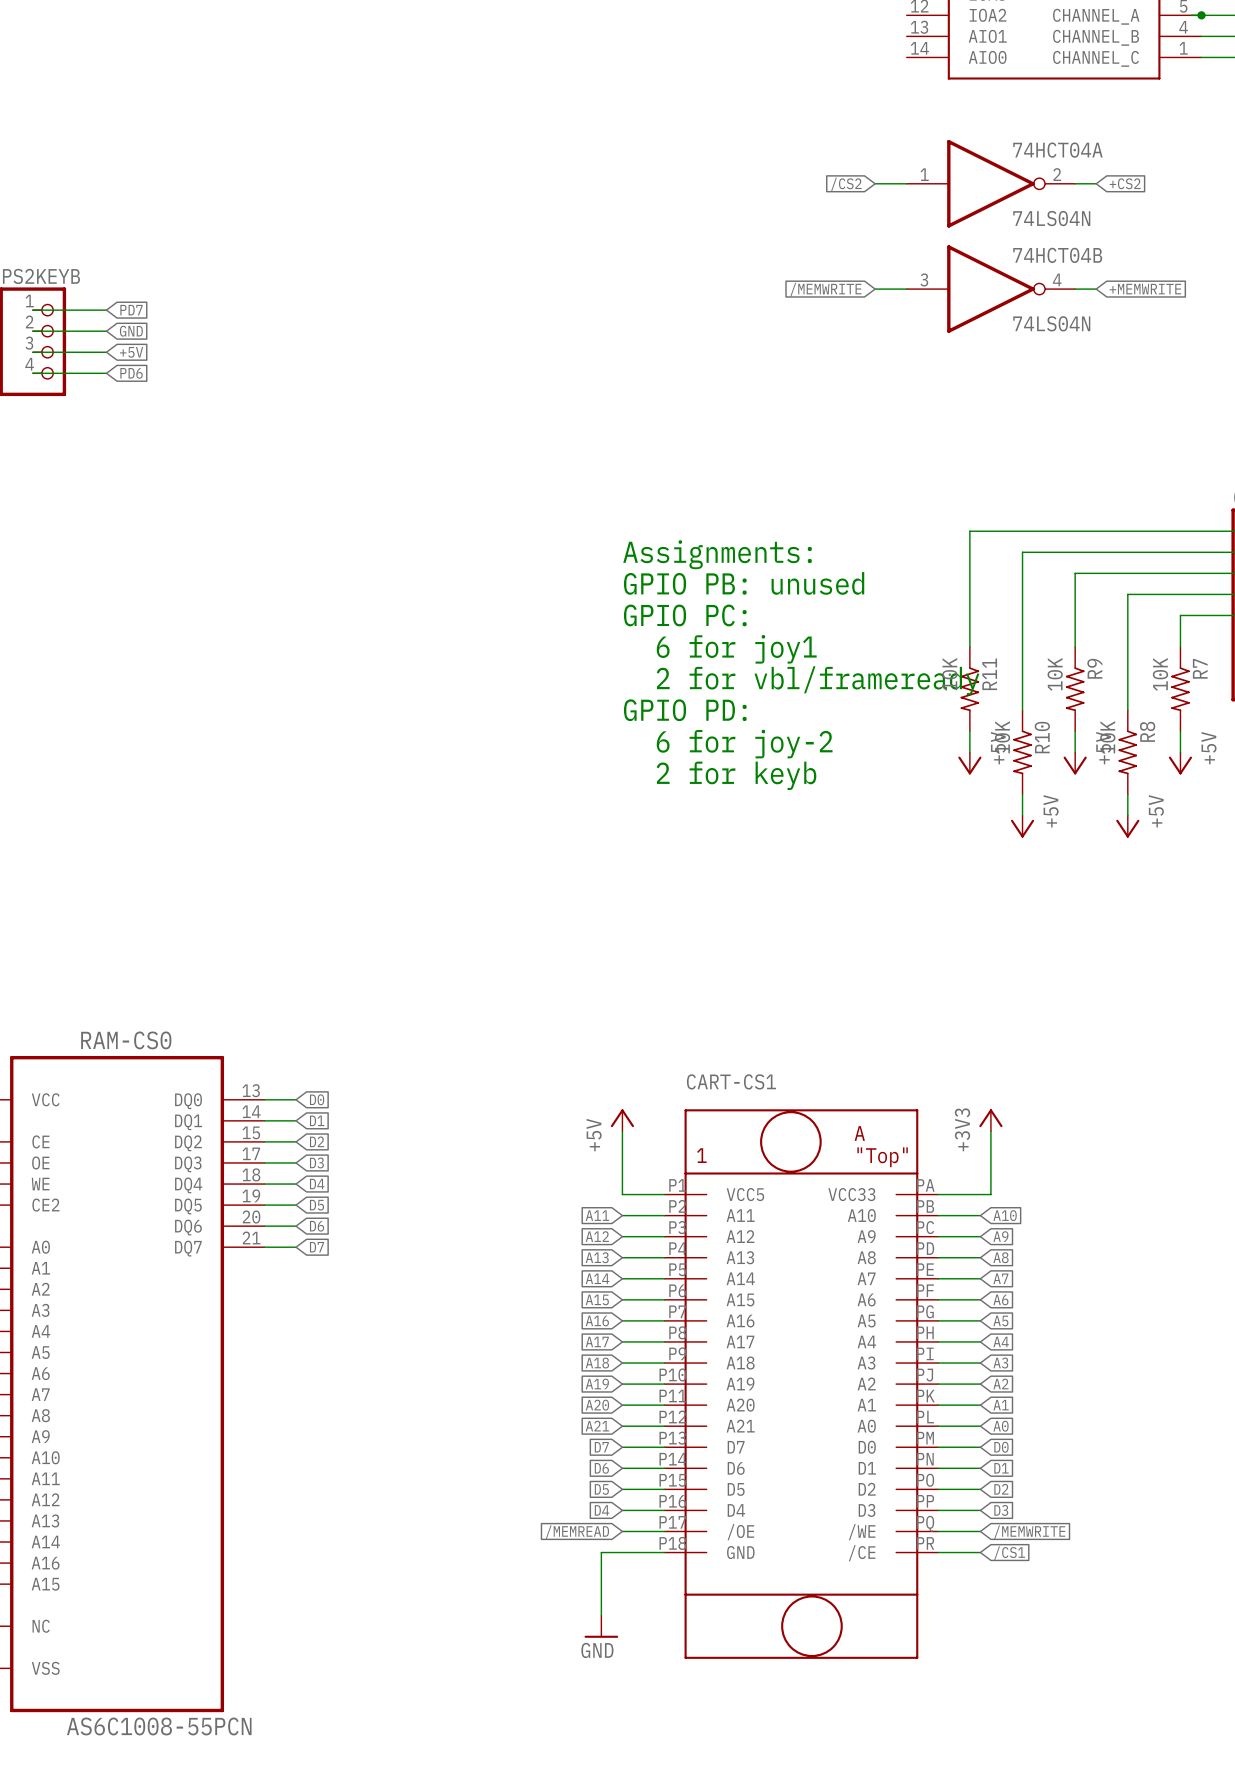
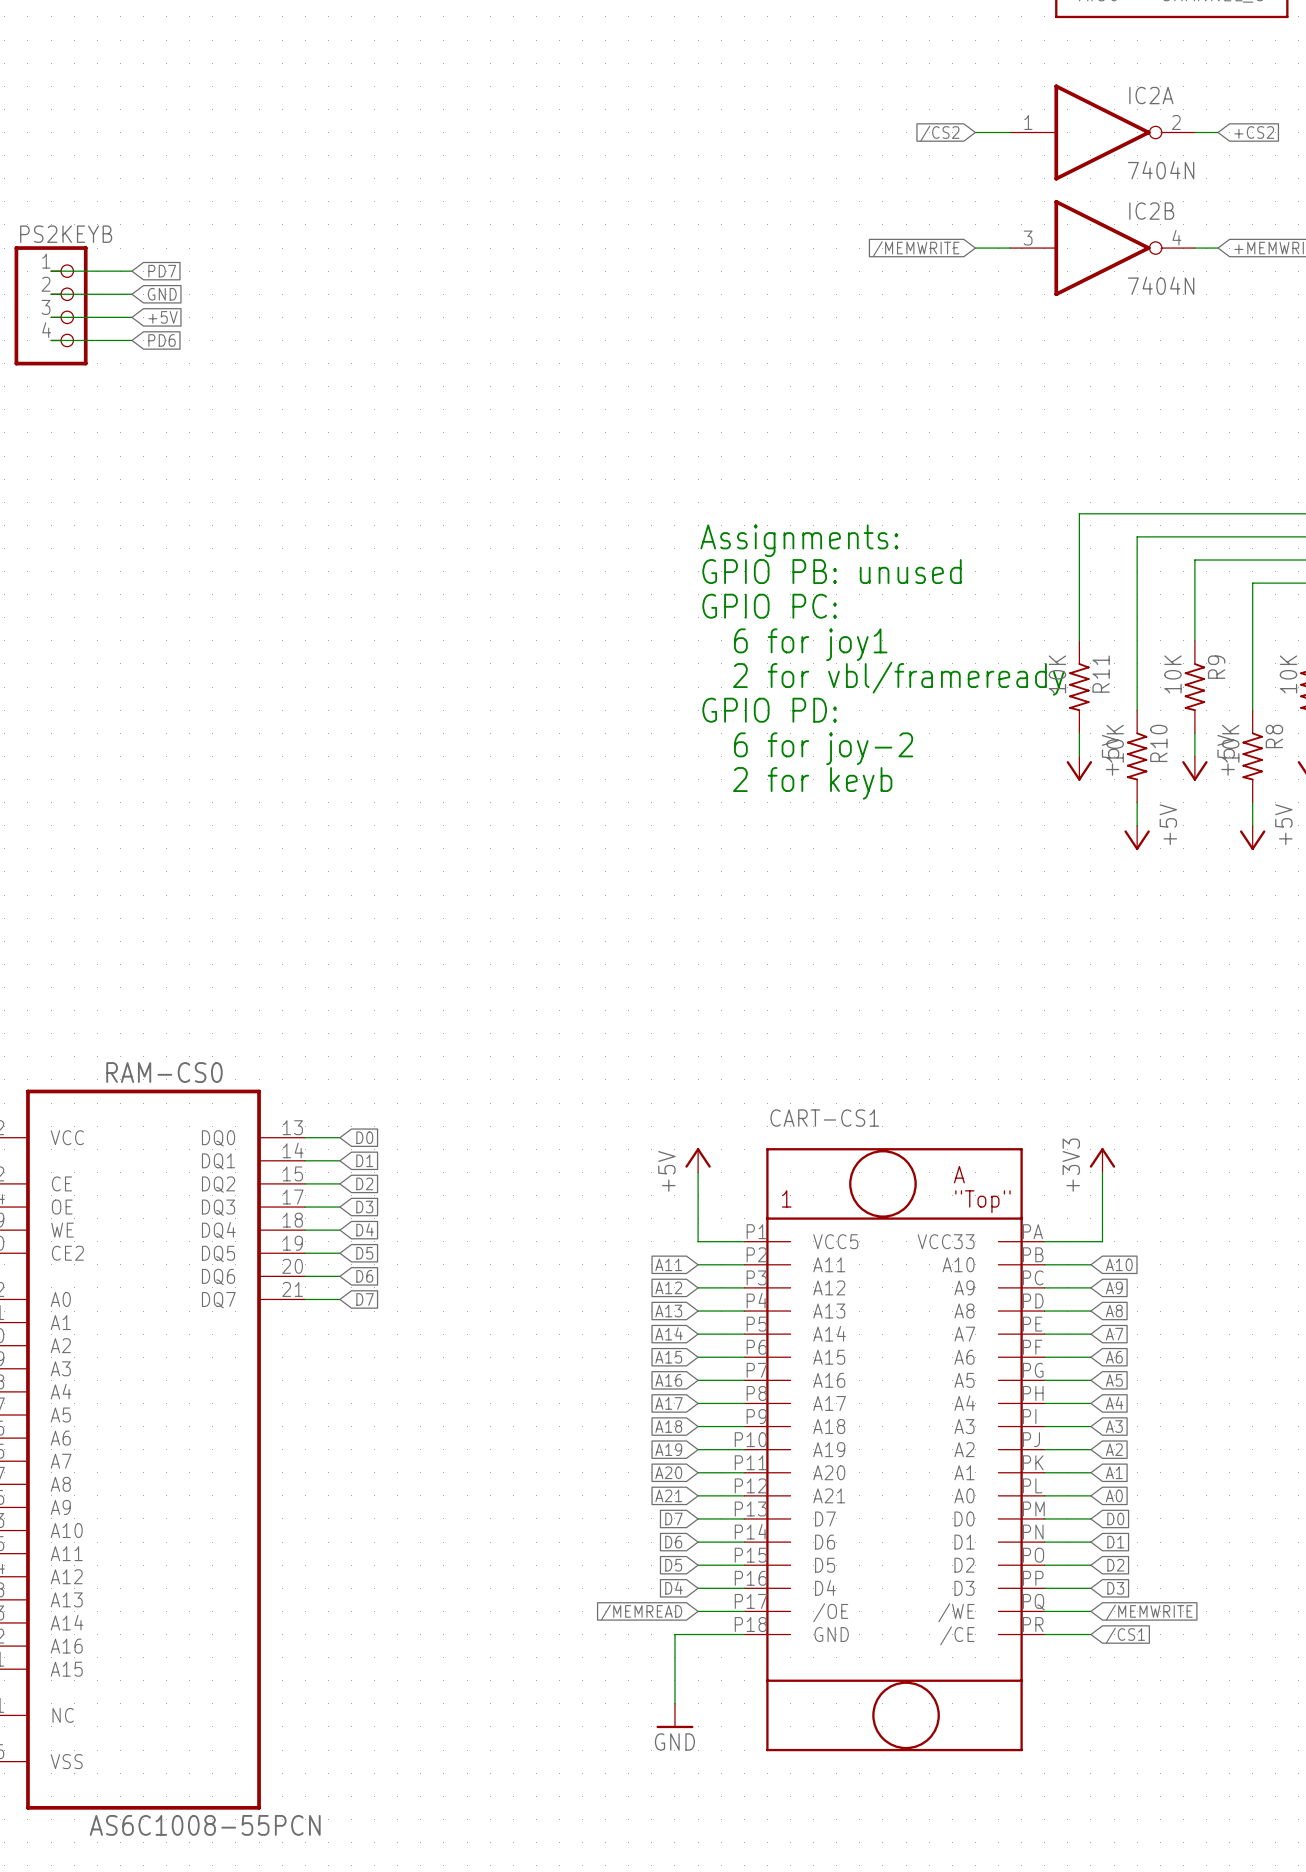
74HCT04A name: 74HCT04A (1057, 150) -> IC2A (1151, 95)
74HCT04A value: 74LS04N (1051, 218) -> 7404N (1161, 170)
74HCT04B name: 74HCT04B (1057, 255) -> IC2B (1151, 211)
74HCT04B value: 74LS04N (1051, 323) -> 7404N (1161, 285)

